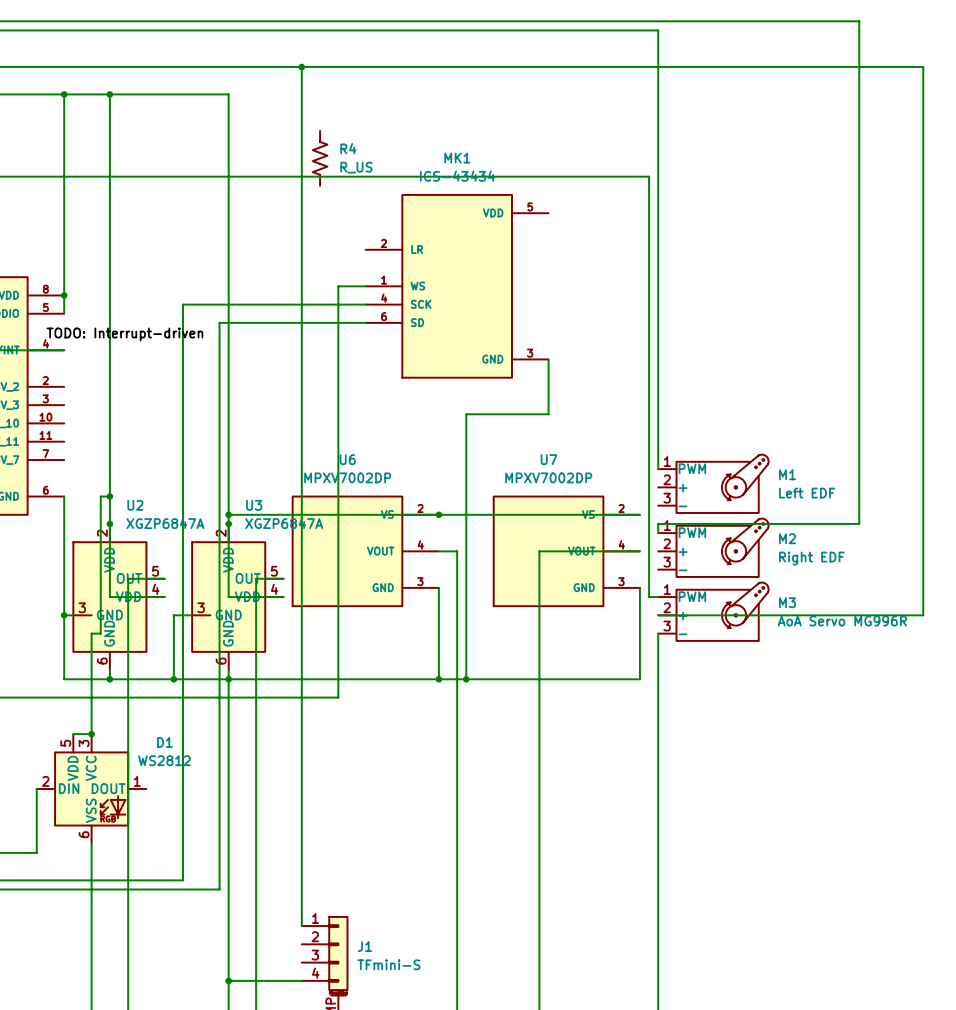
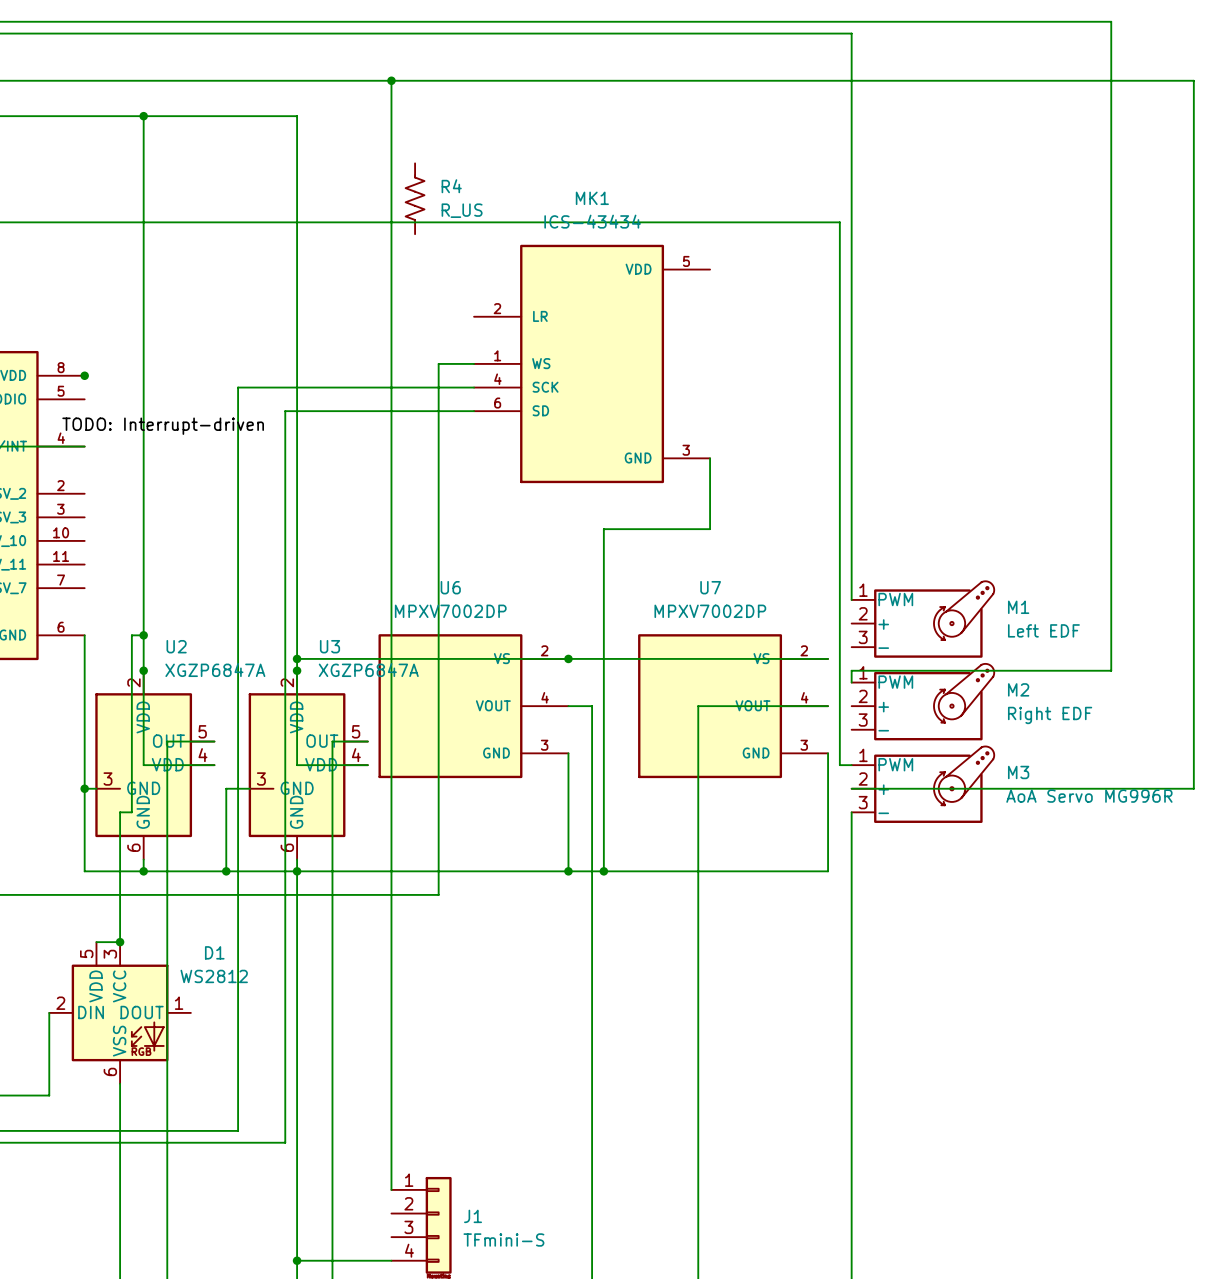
wire: (64, 94) (64, 313) -> none
junction: (64, 94) -> none

